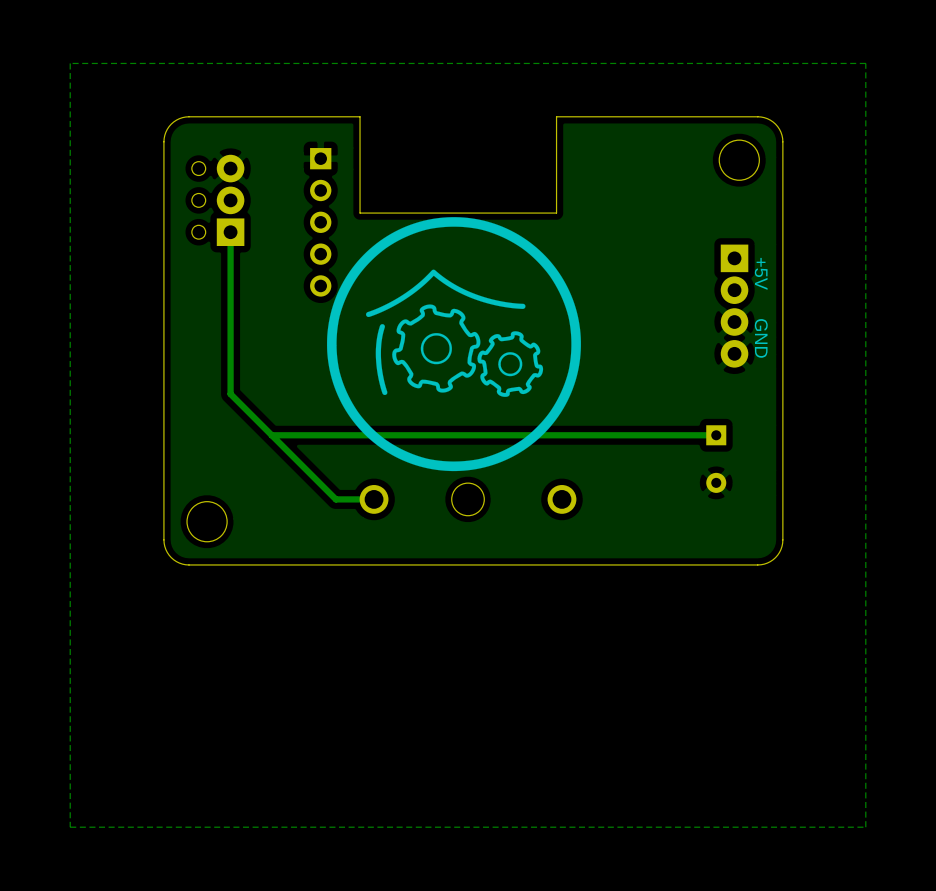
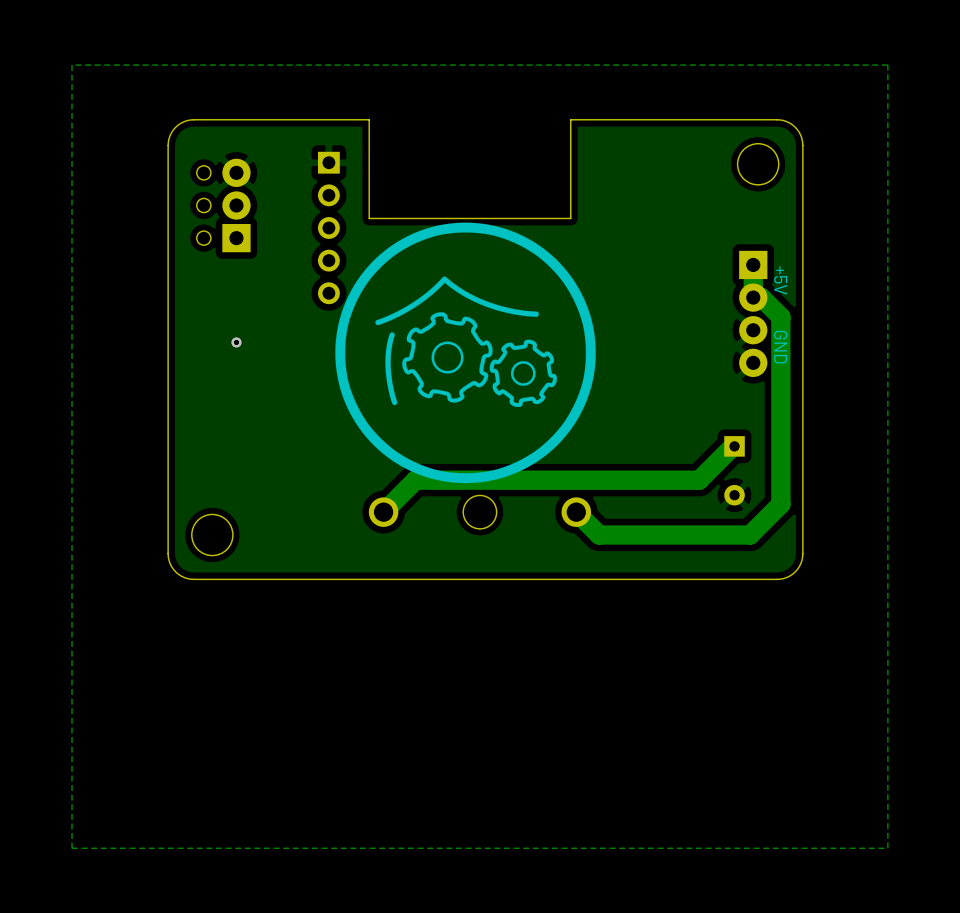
track: (230, 232) (230, 394) (335, 499) (374, 499) -> none
track: none -> (753, 264) (753, 297) (761, 297) (780, 316) (780, 504) (750, 535) (599, 535) (576, 512)
via: none -> (236, 342)
track: (714, 435) (271, 435) -> (733, 446) (699, 480) (415, 480) (383, 512)

